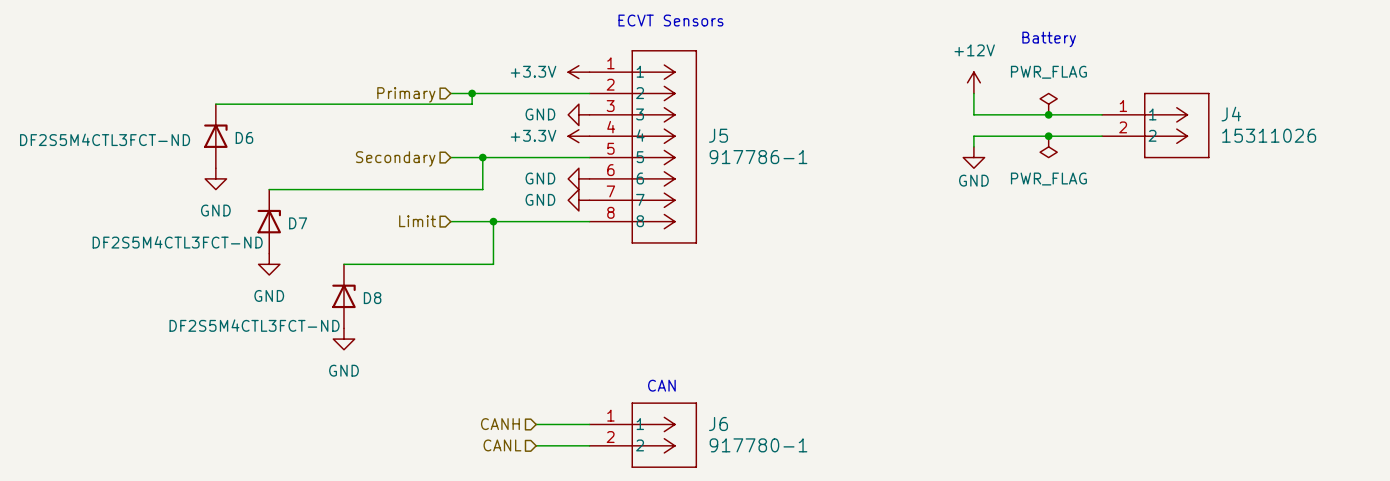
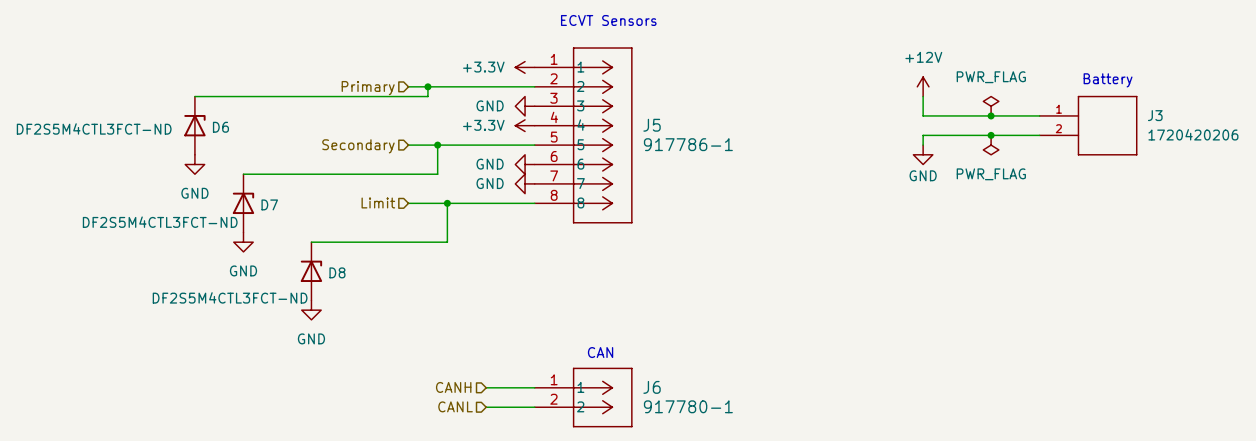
text position: Battery (1049, 39) -> Battery (1108, 80)
power symbol position: +12V (973, 82) -> +12V (923, 86)
wire: (973, 93) (973, 114) (1102, 114) -> (923, 96) (923, 115) (1039, 115)
power symbol: PWR_FLAG (1048, 104) -> none
junction: (1048, 114) -> none
power symbol: none -> PWR_FLAG (991, 106)
junction: none -> (991, 115)
J4: 15311026 (1155, 125) -> none
junction: (1048, 136) -> none
wire: (1102, 136) (973, 136) (973, 146) -> (1039, 135) (923, 135) (923, 145)
J3: none -> 1720420206 (1088, 125)
power symbol: PWR_FLAG (1048, 146) -> none
junction: none -> (991, 135)
power symbol position: GND (973, 157) -> GND (923, 154)
power symbol: none -> PWR_FLAG (991, 145)

